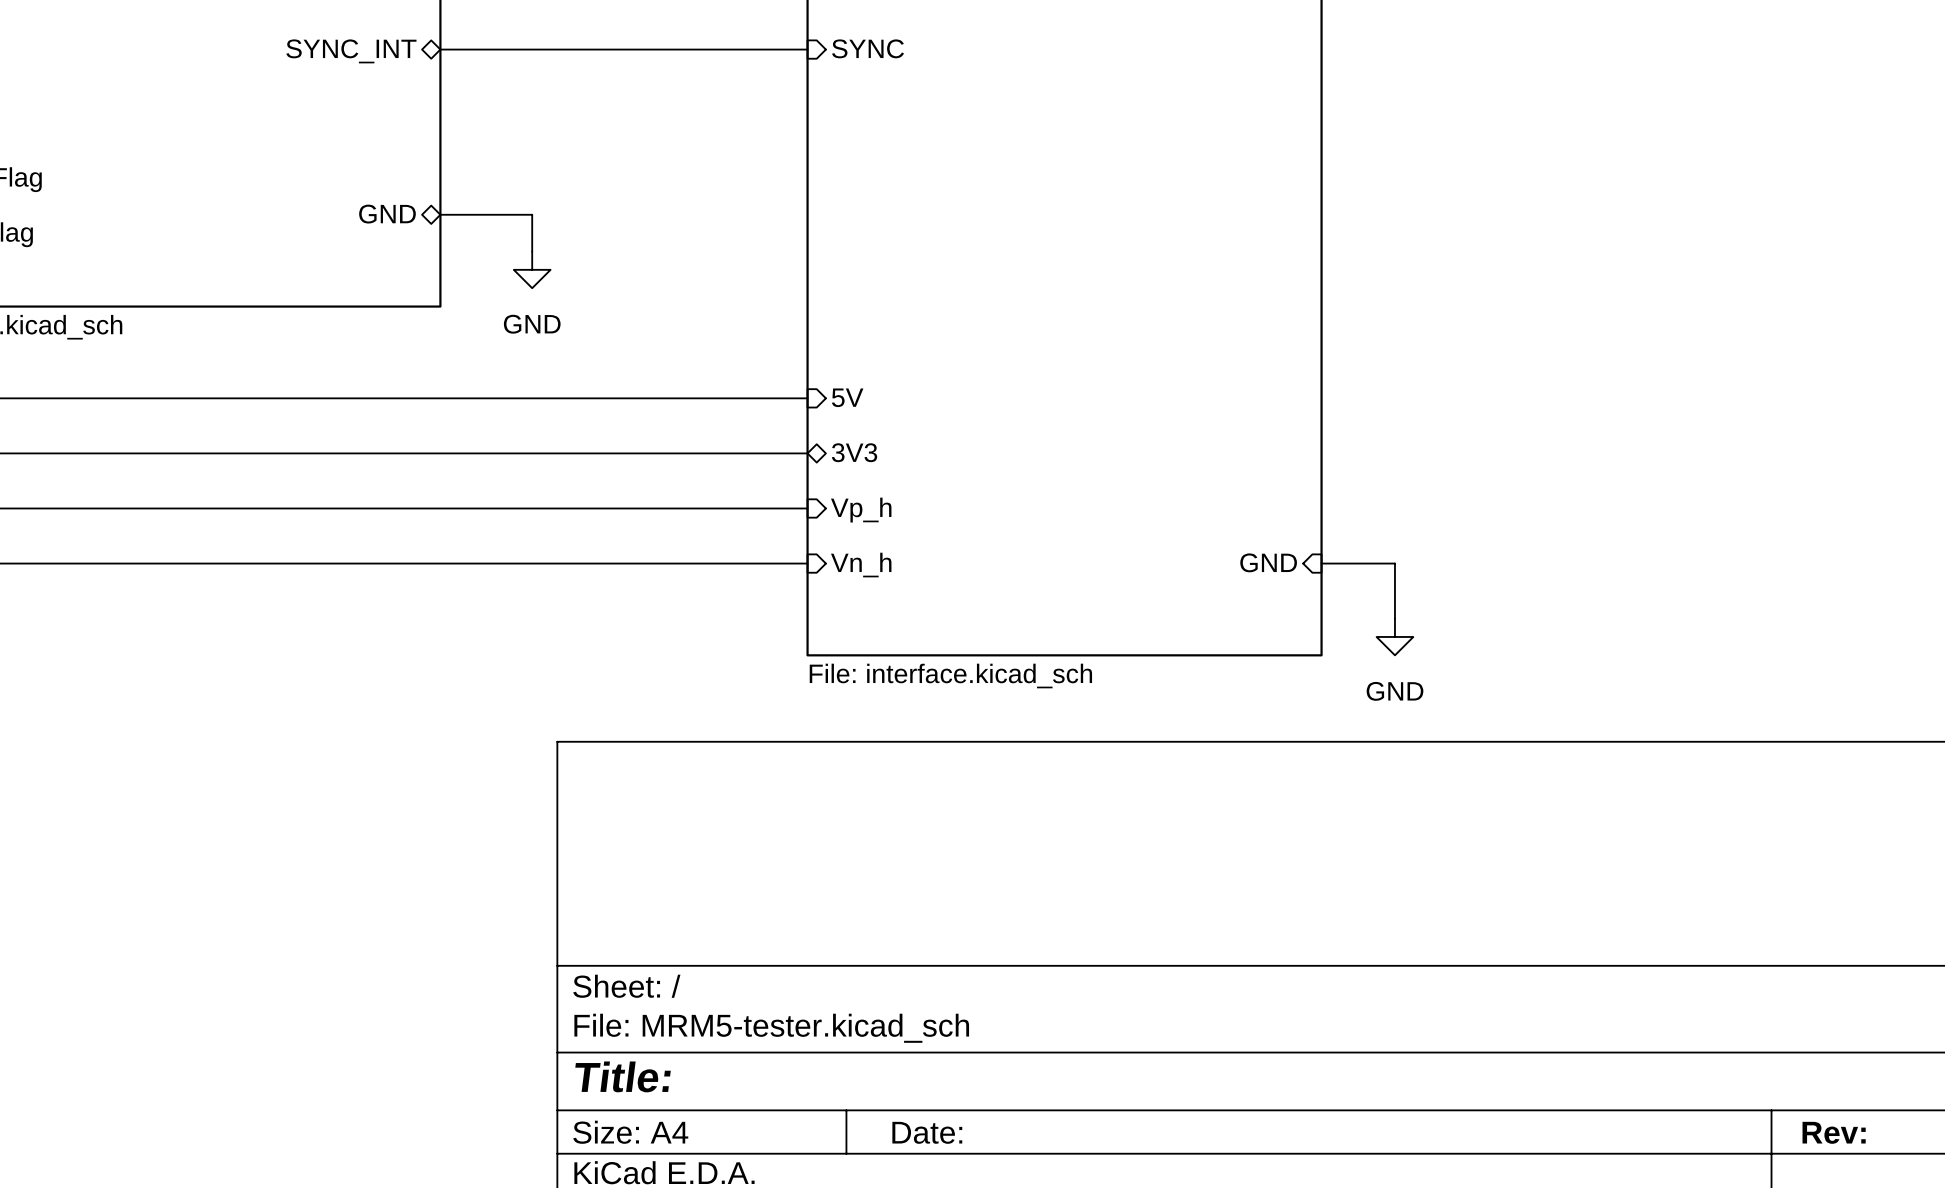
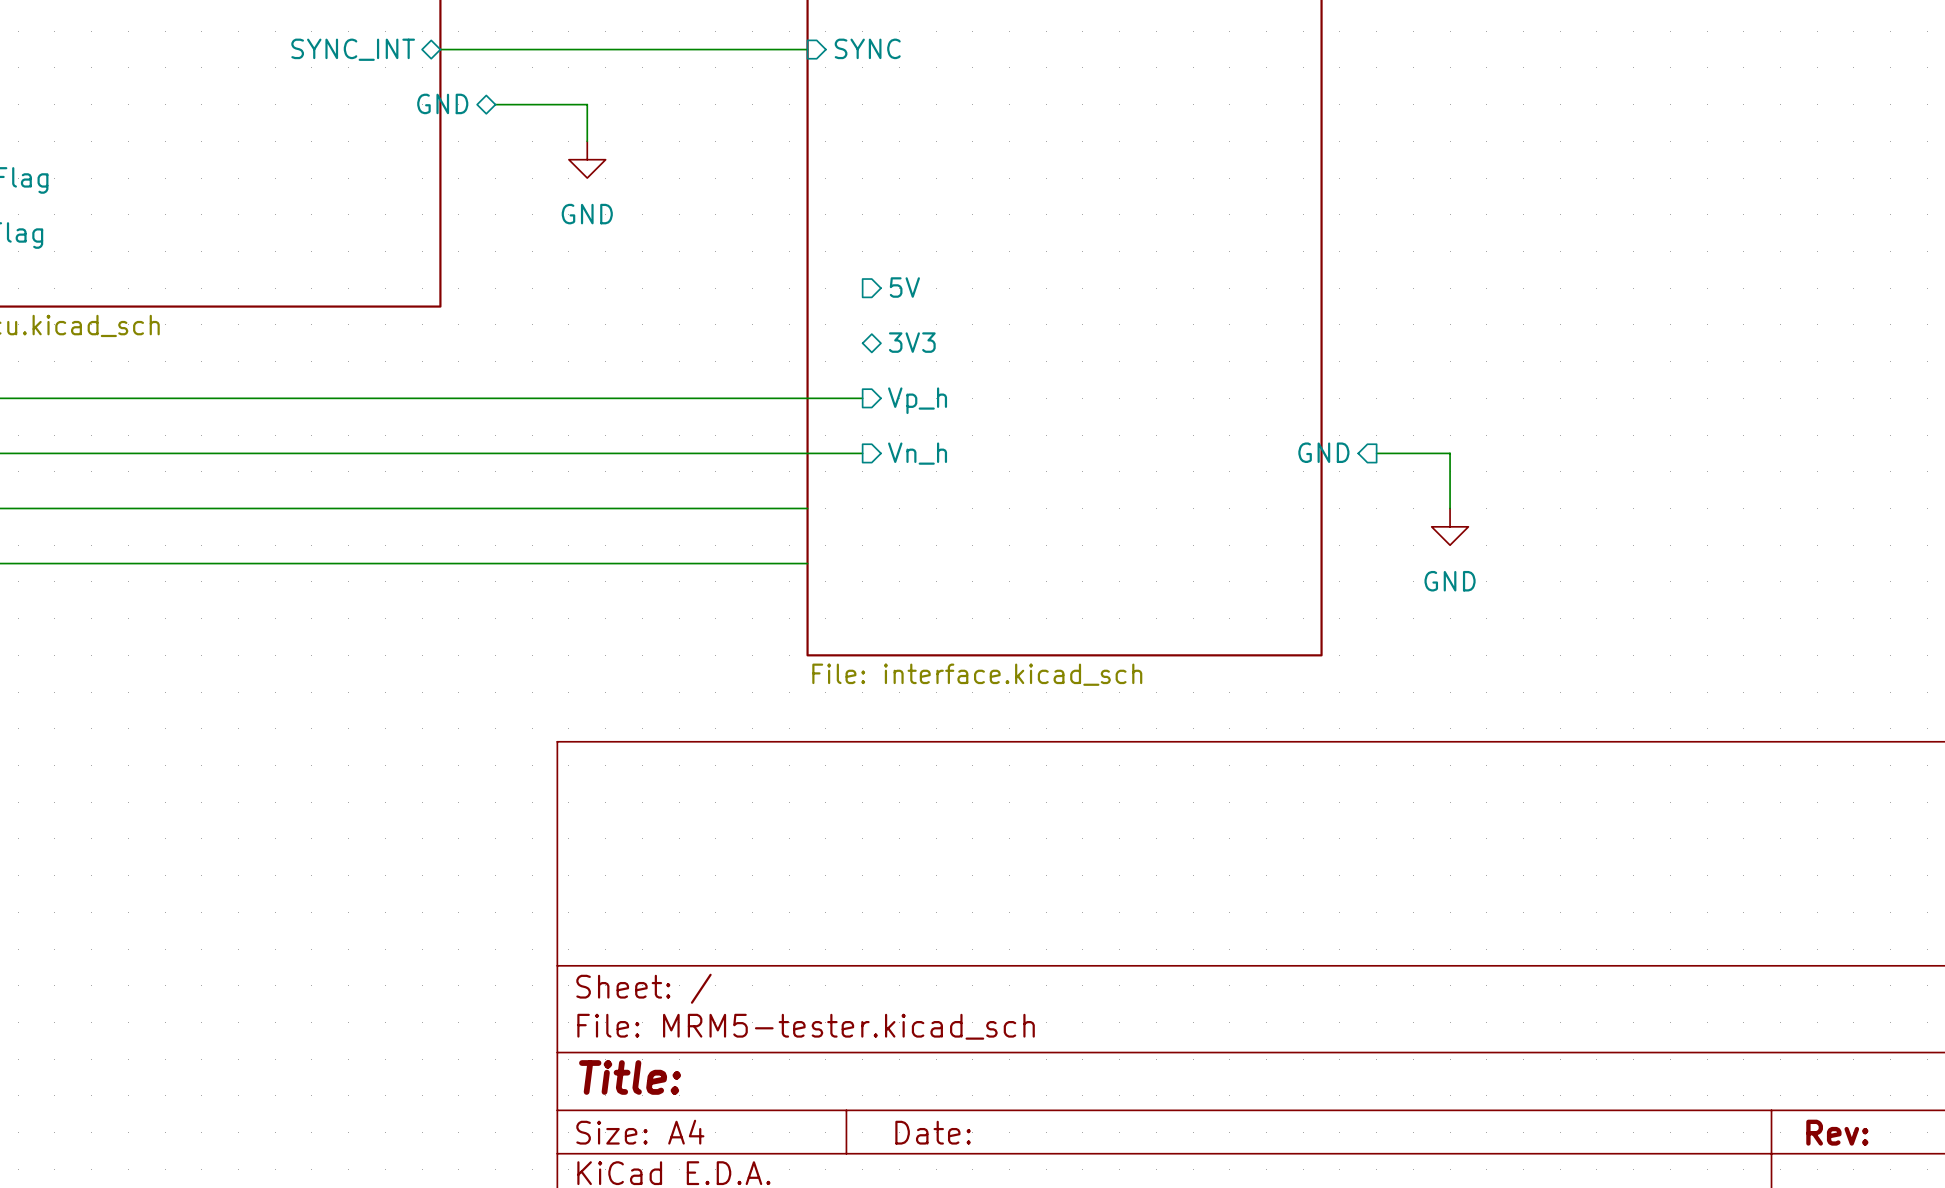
sheet pin position: GND (387, 214) -> GND (442, 103)
wire: (440, 214) (532, 214) (532, 251) -> (495, 104) (587, 104) (587, 141)
power symbol position: GND (532, 269) -> GND (587, 159)
sheet pin position: 5V (847, 397) -> 5V (904, 287)
wire: none -> (807, 398) (862, 398)
sheet pin position: 3V3 (854, 452) -> 3V3 (912, 342)
wire: none -> (807, 453) (862, 453)
sheet pin position: Vp_h (861, 510) -> Vp_h (917, 400)
sheet pin position: GND (1268, 562) -> GND (1323, 452)
wire: (1321, 563) (1394, 563) (1394, 618) -> (1376, 453) (1450, 453) (1450, 508)
sheet pin position: Vn_h (861, 565) -> Vn_h (917, 453)
power symbol position: GND (1394, 636) -> GND (1450, 526)

